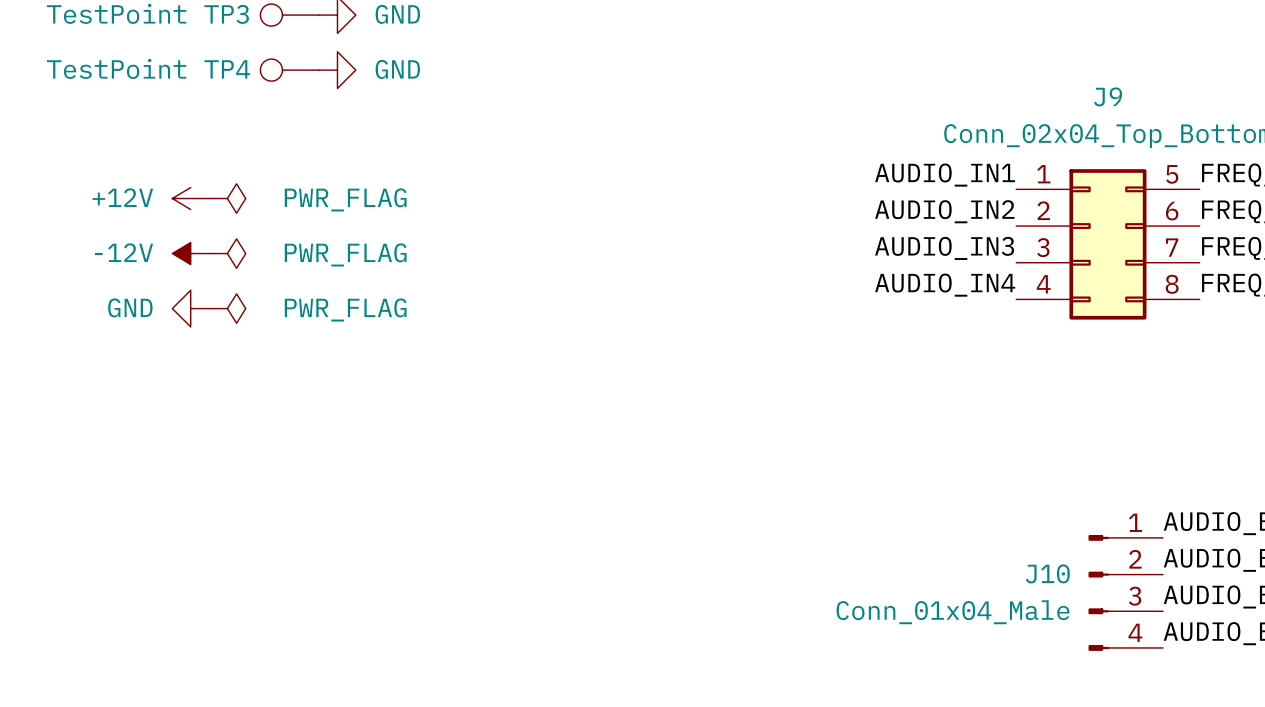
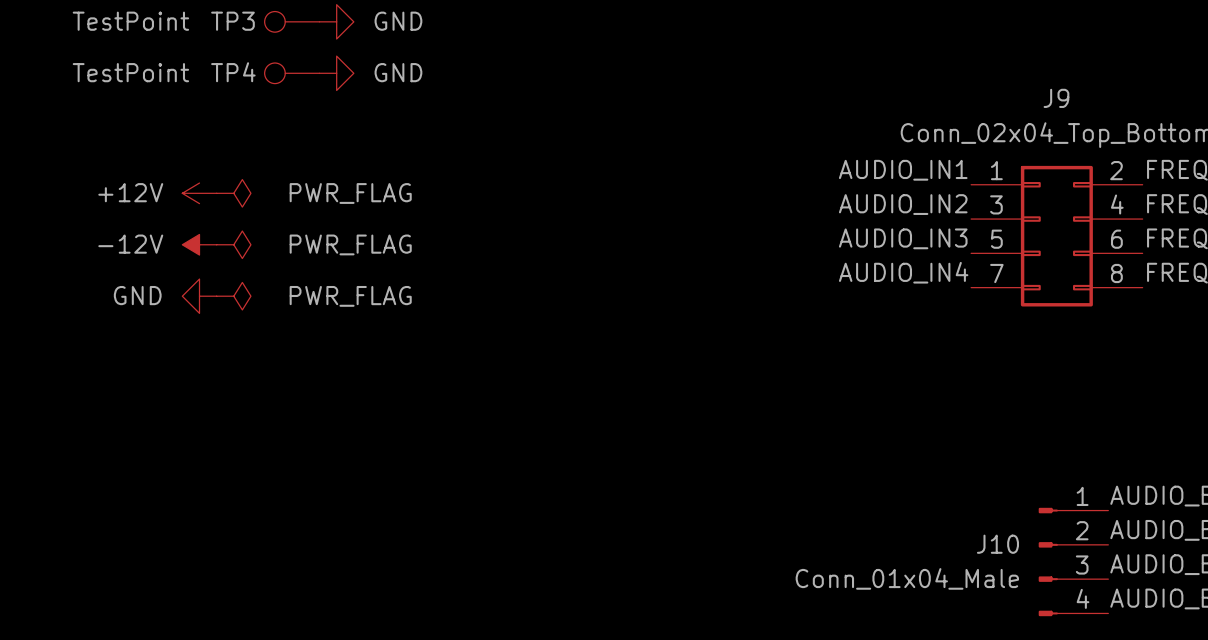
J9 pin number: 5 (1172, 174) -> 2 (1116, 170)
J9 pin number: 2 (1043, 210) -> 3 (996, 204)
J9 pin number: 6 (1172, 211) -> 4 (1117, 204)
J9 pin number: 3 (1043, 247) -> 5 (996, 239)
J9 pin number: 7 (1172, 247) -> 6 (1116, 239)
J9 pin number: 4 (1043, 284) -> 7 (996, 273)

